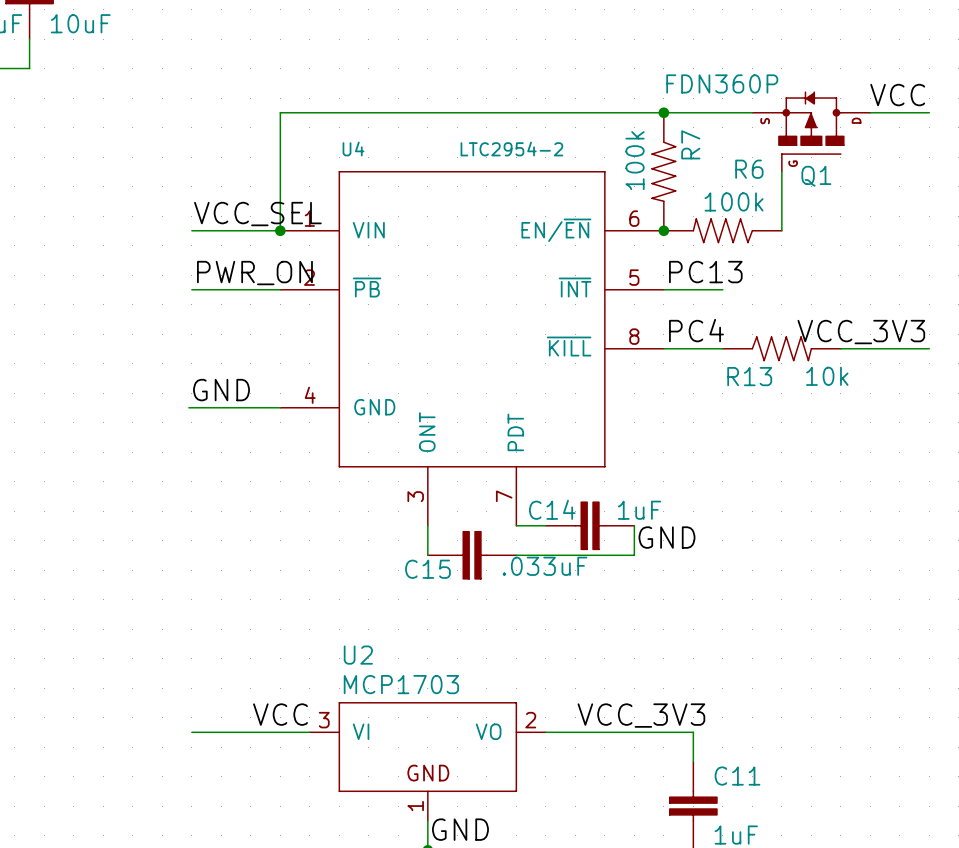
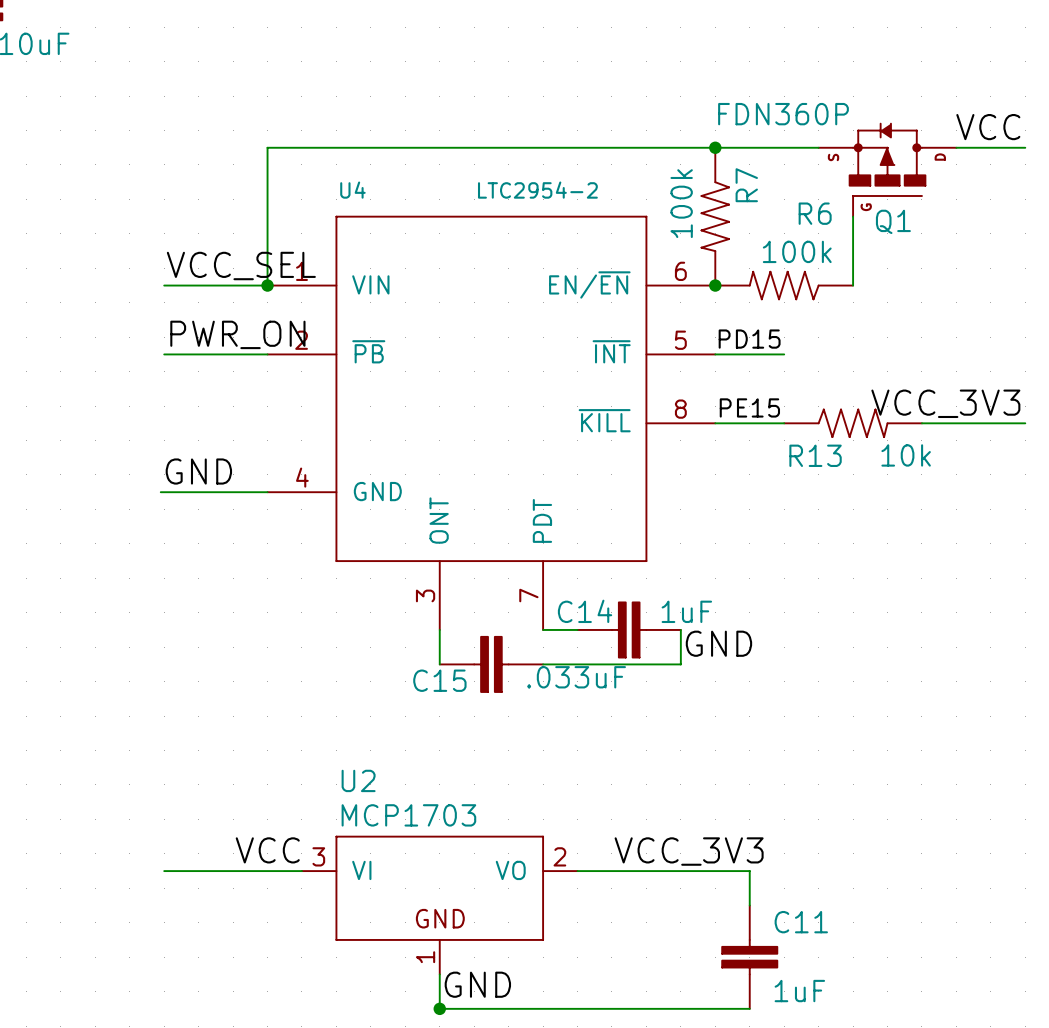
label: PC13 (705, 272) -> none
label: none -> PD15 (749, 339)
label: PC4 (696, 330) -> PE15 (749, 407)

